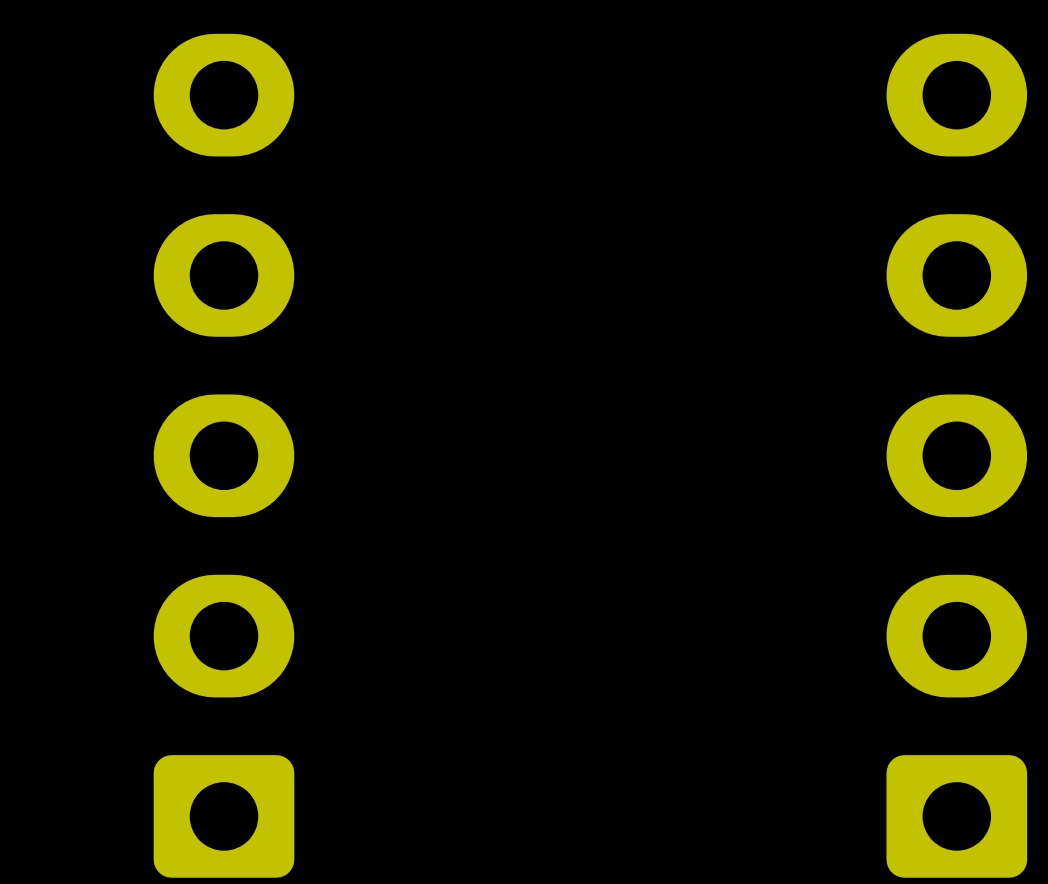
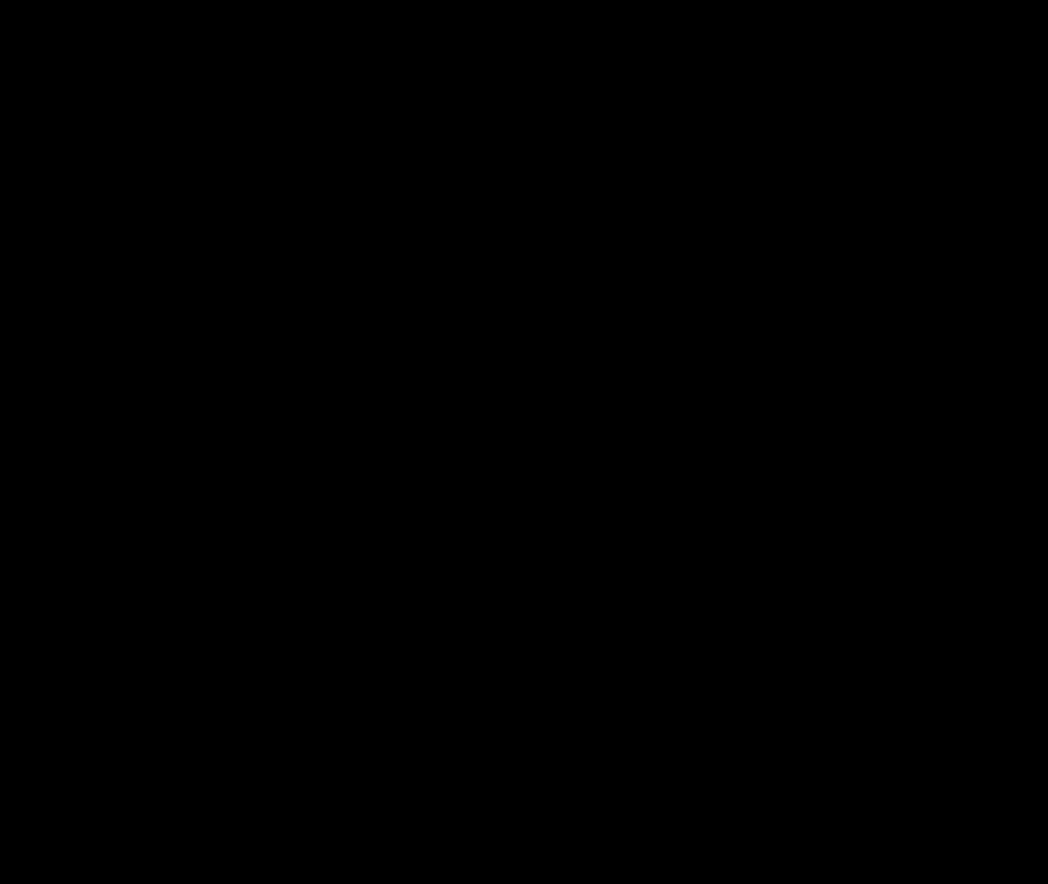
part: (223, 455) -> none
part: (956, 455) -> none

